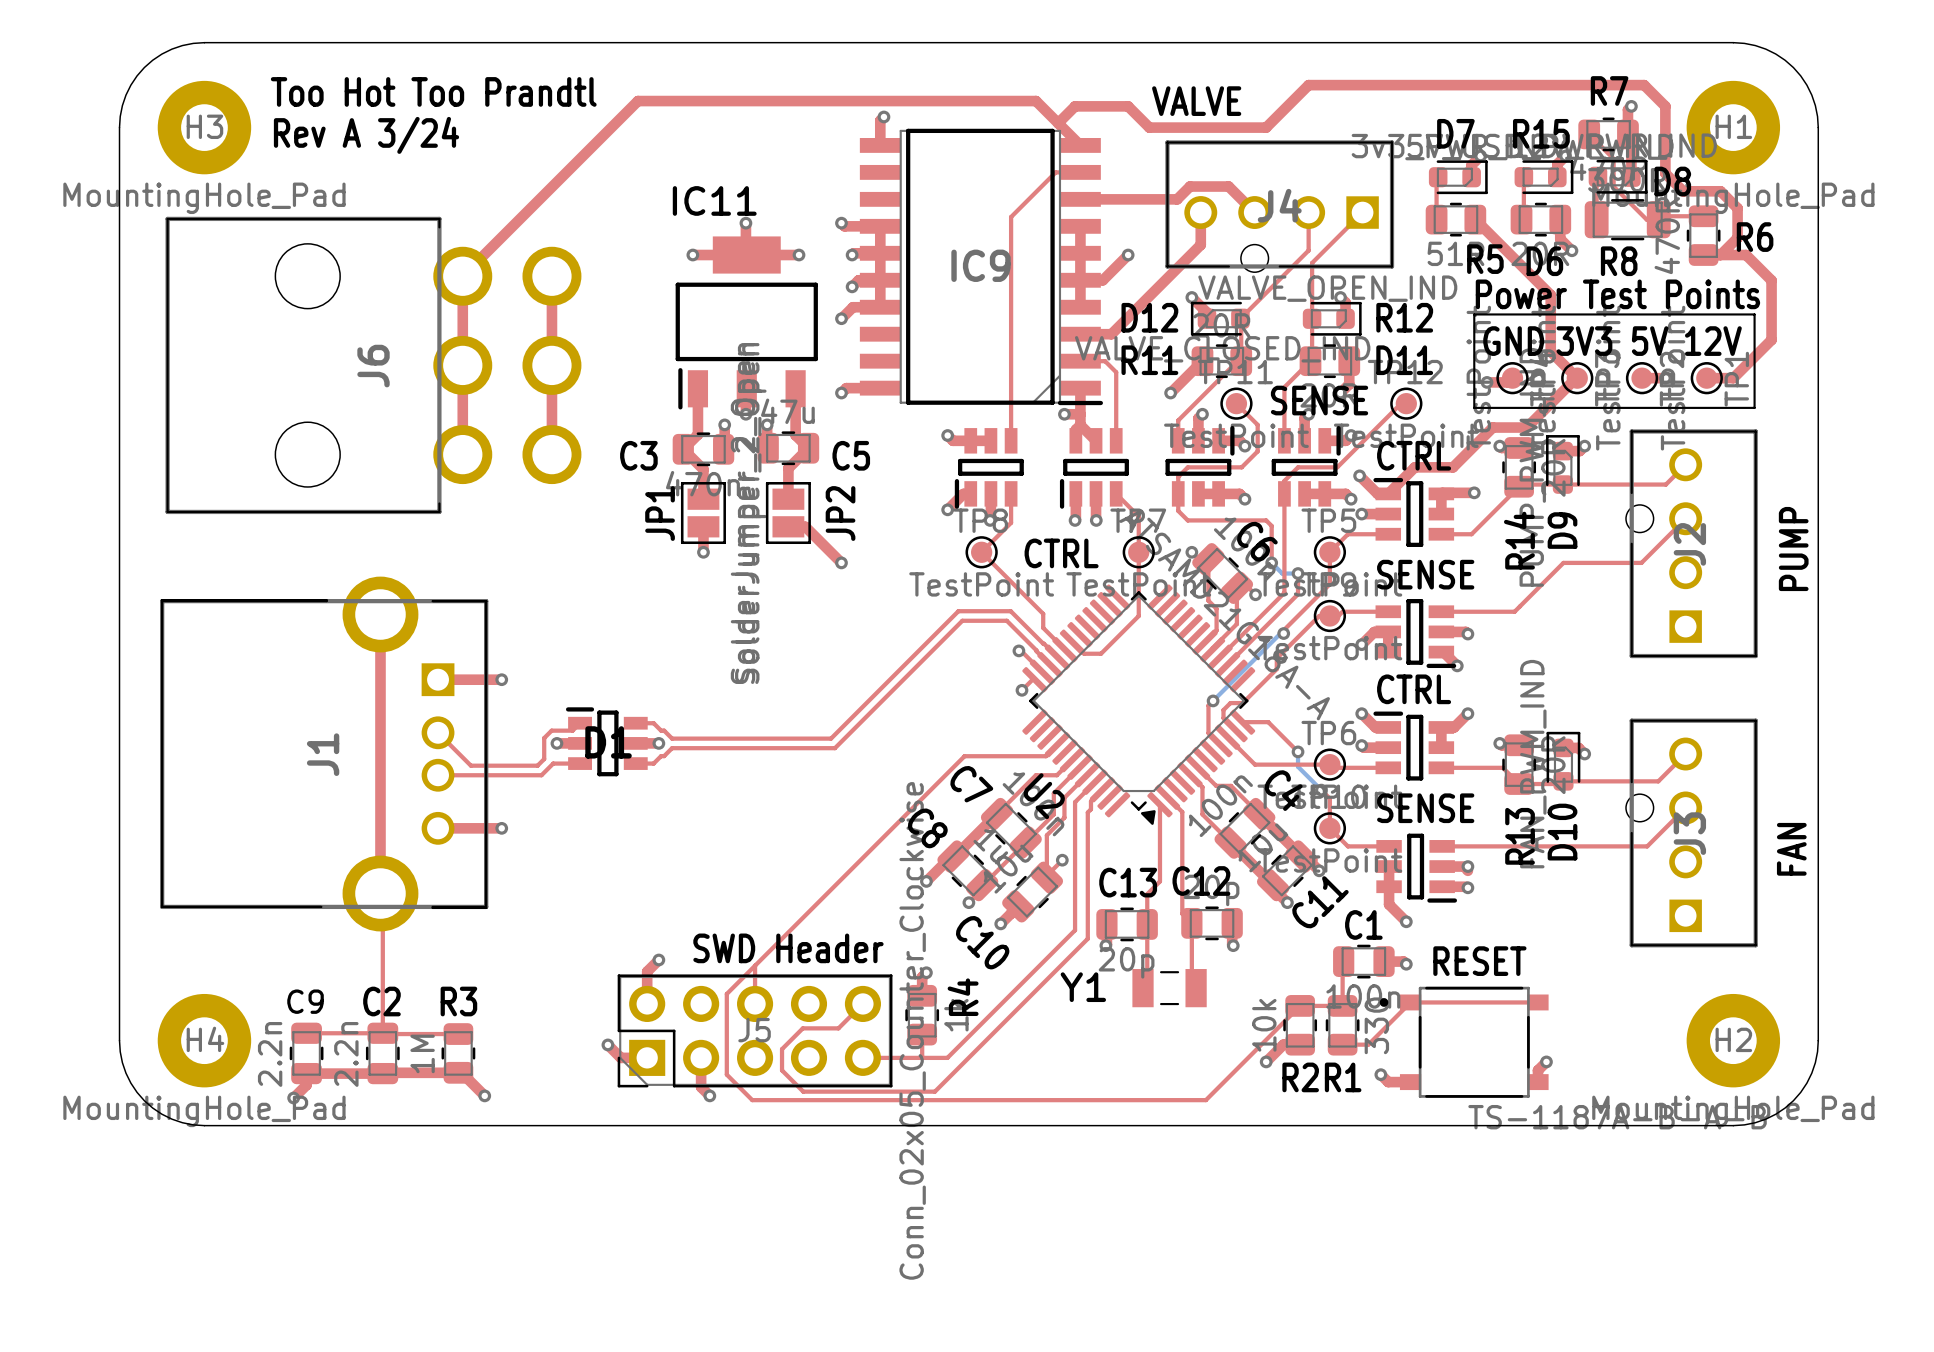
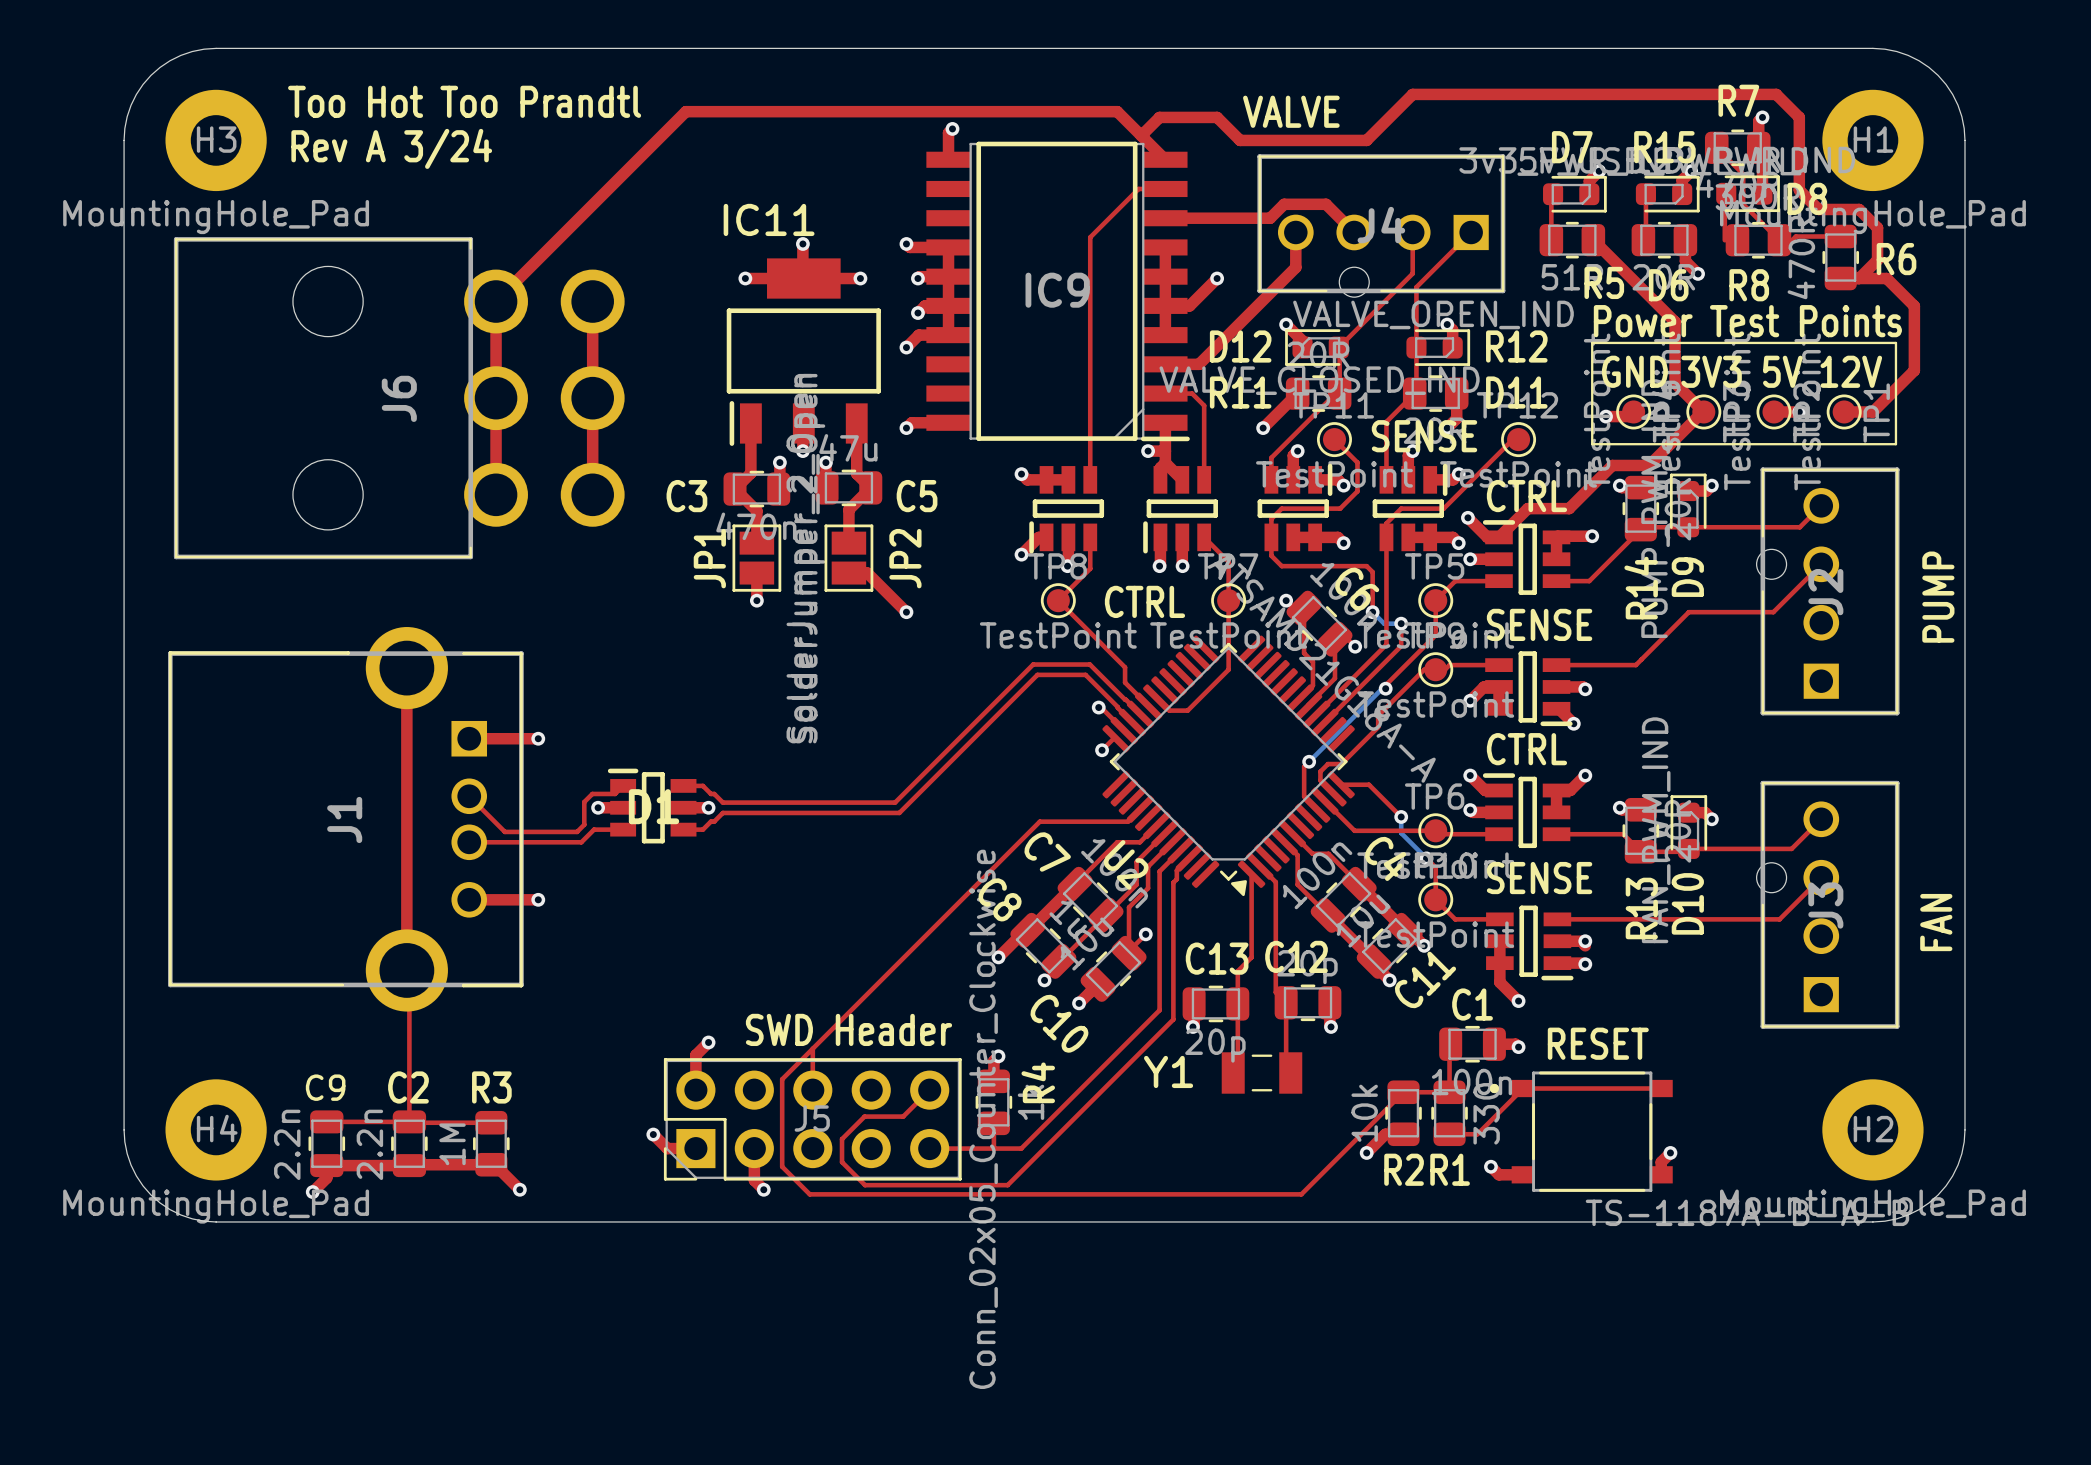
R8 footprint: [1584, 199, 1671, 241] -> [1725, 221, 1792, 259]

